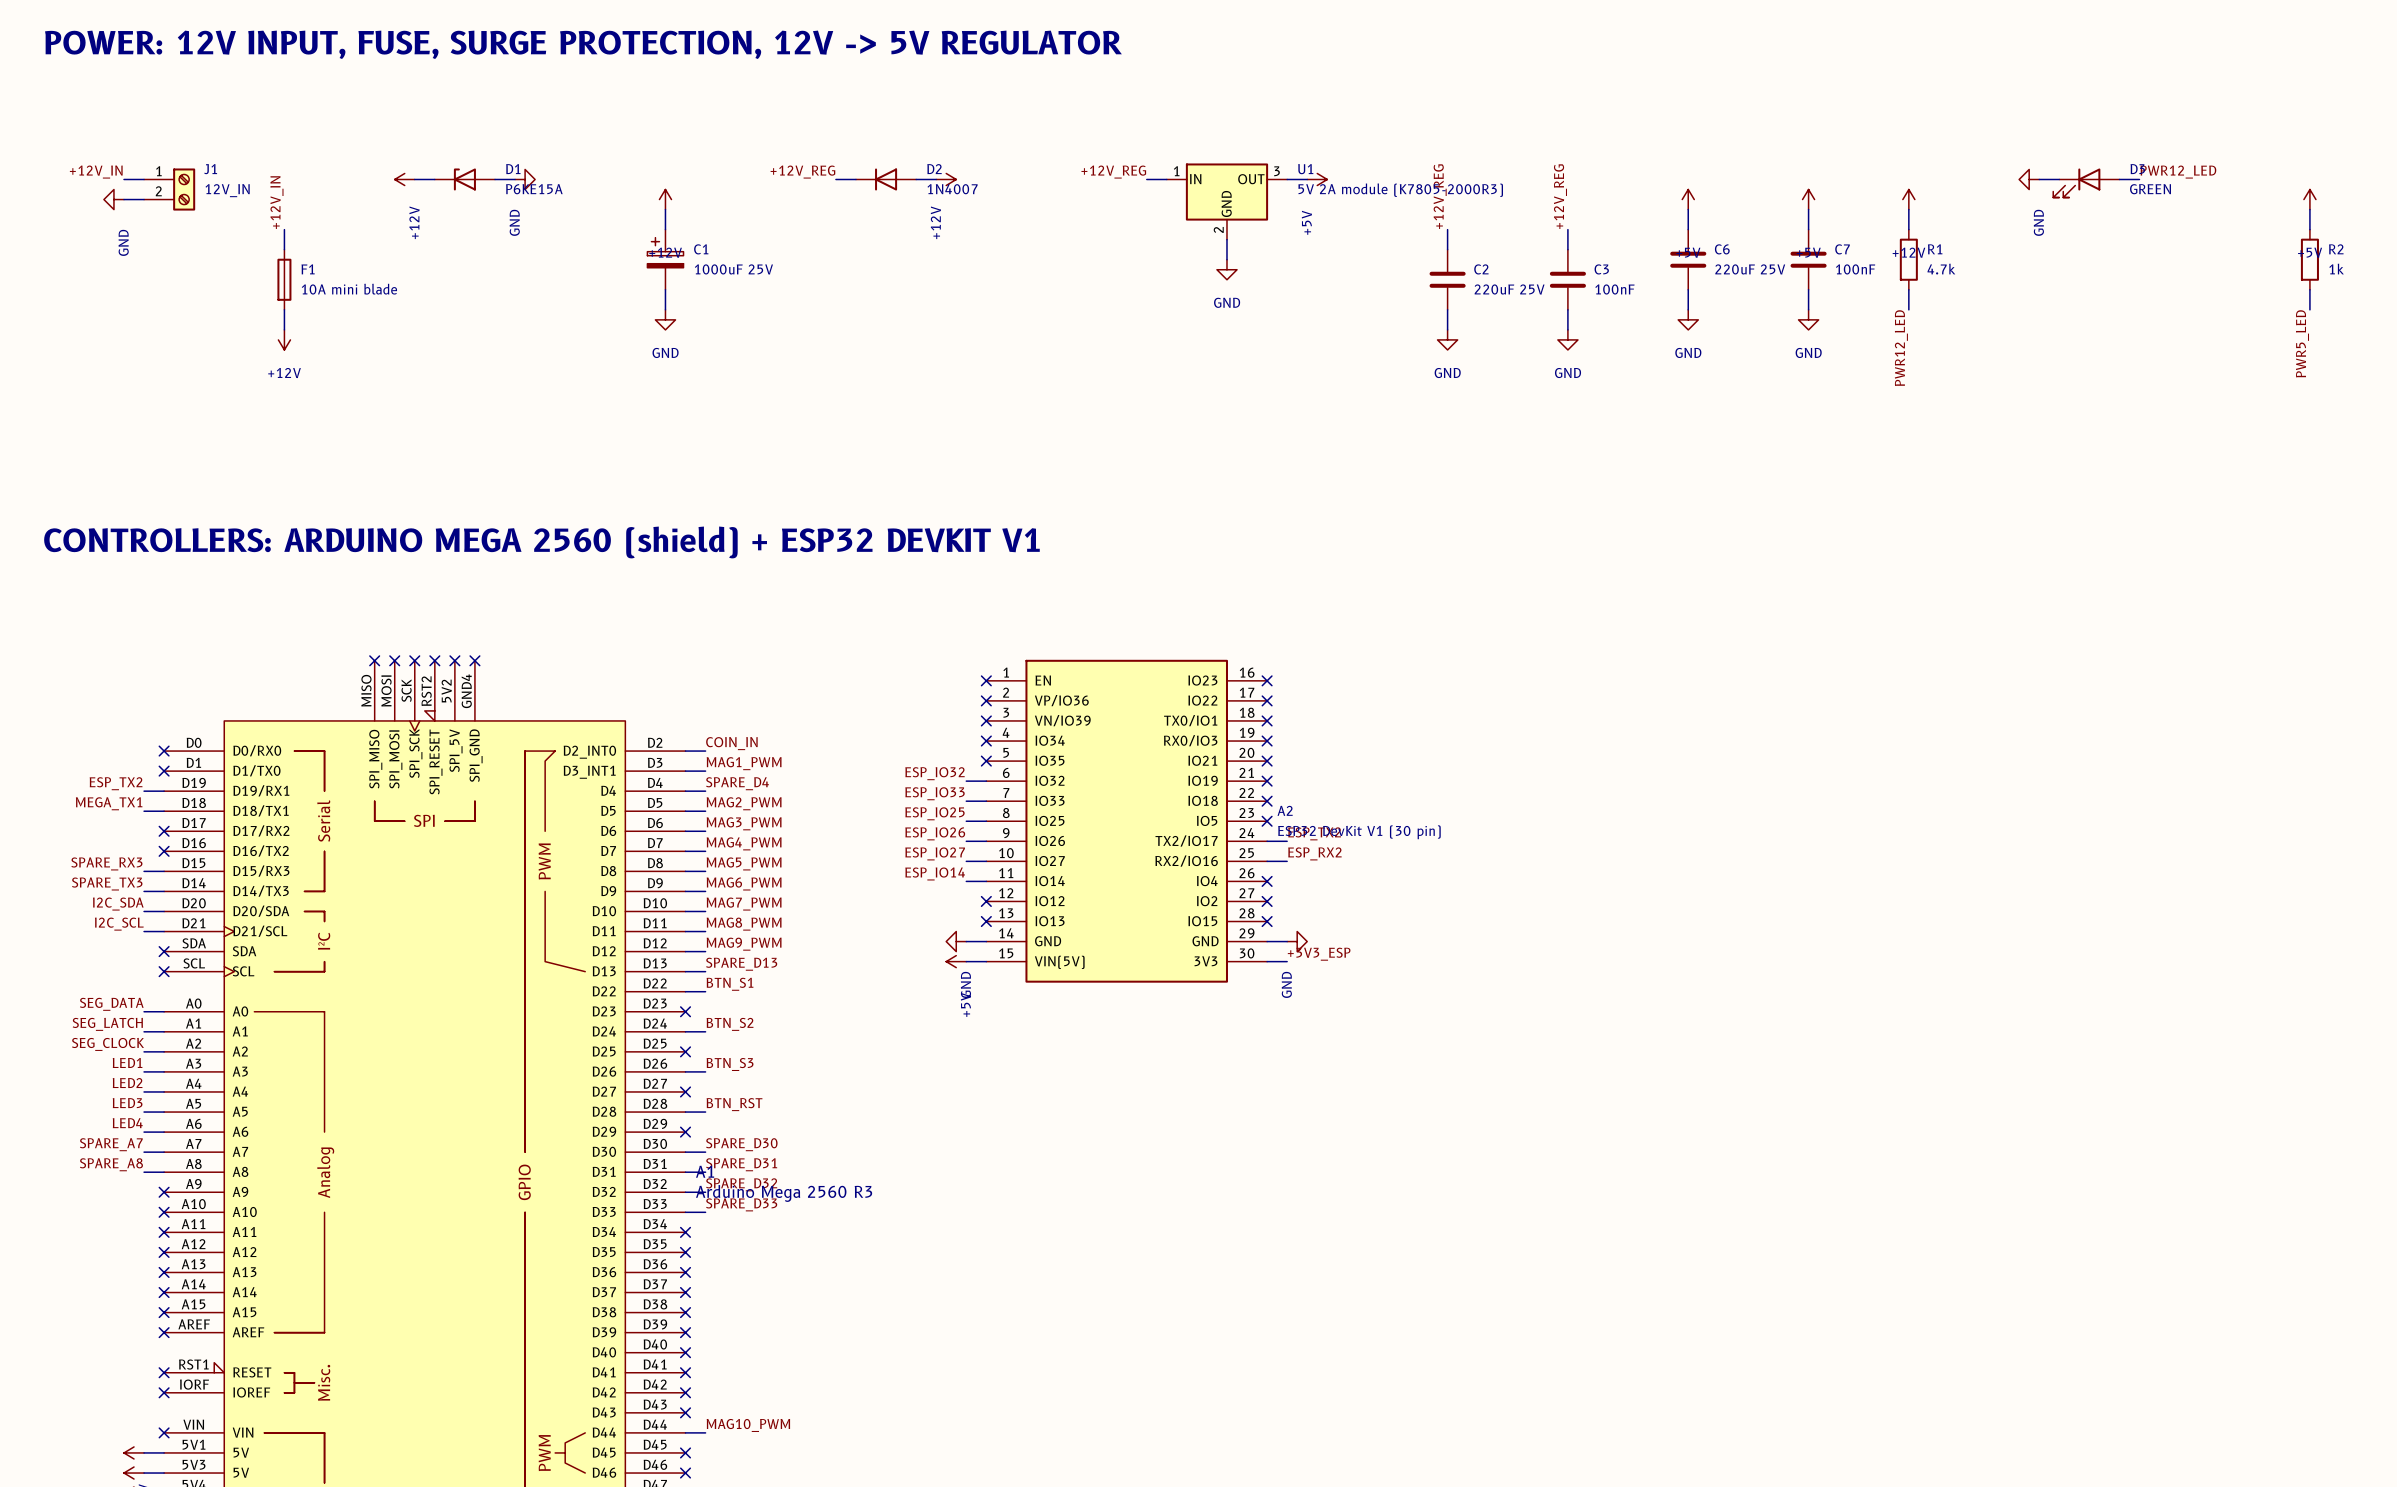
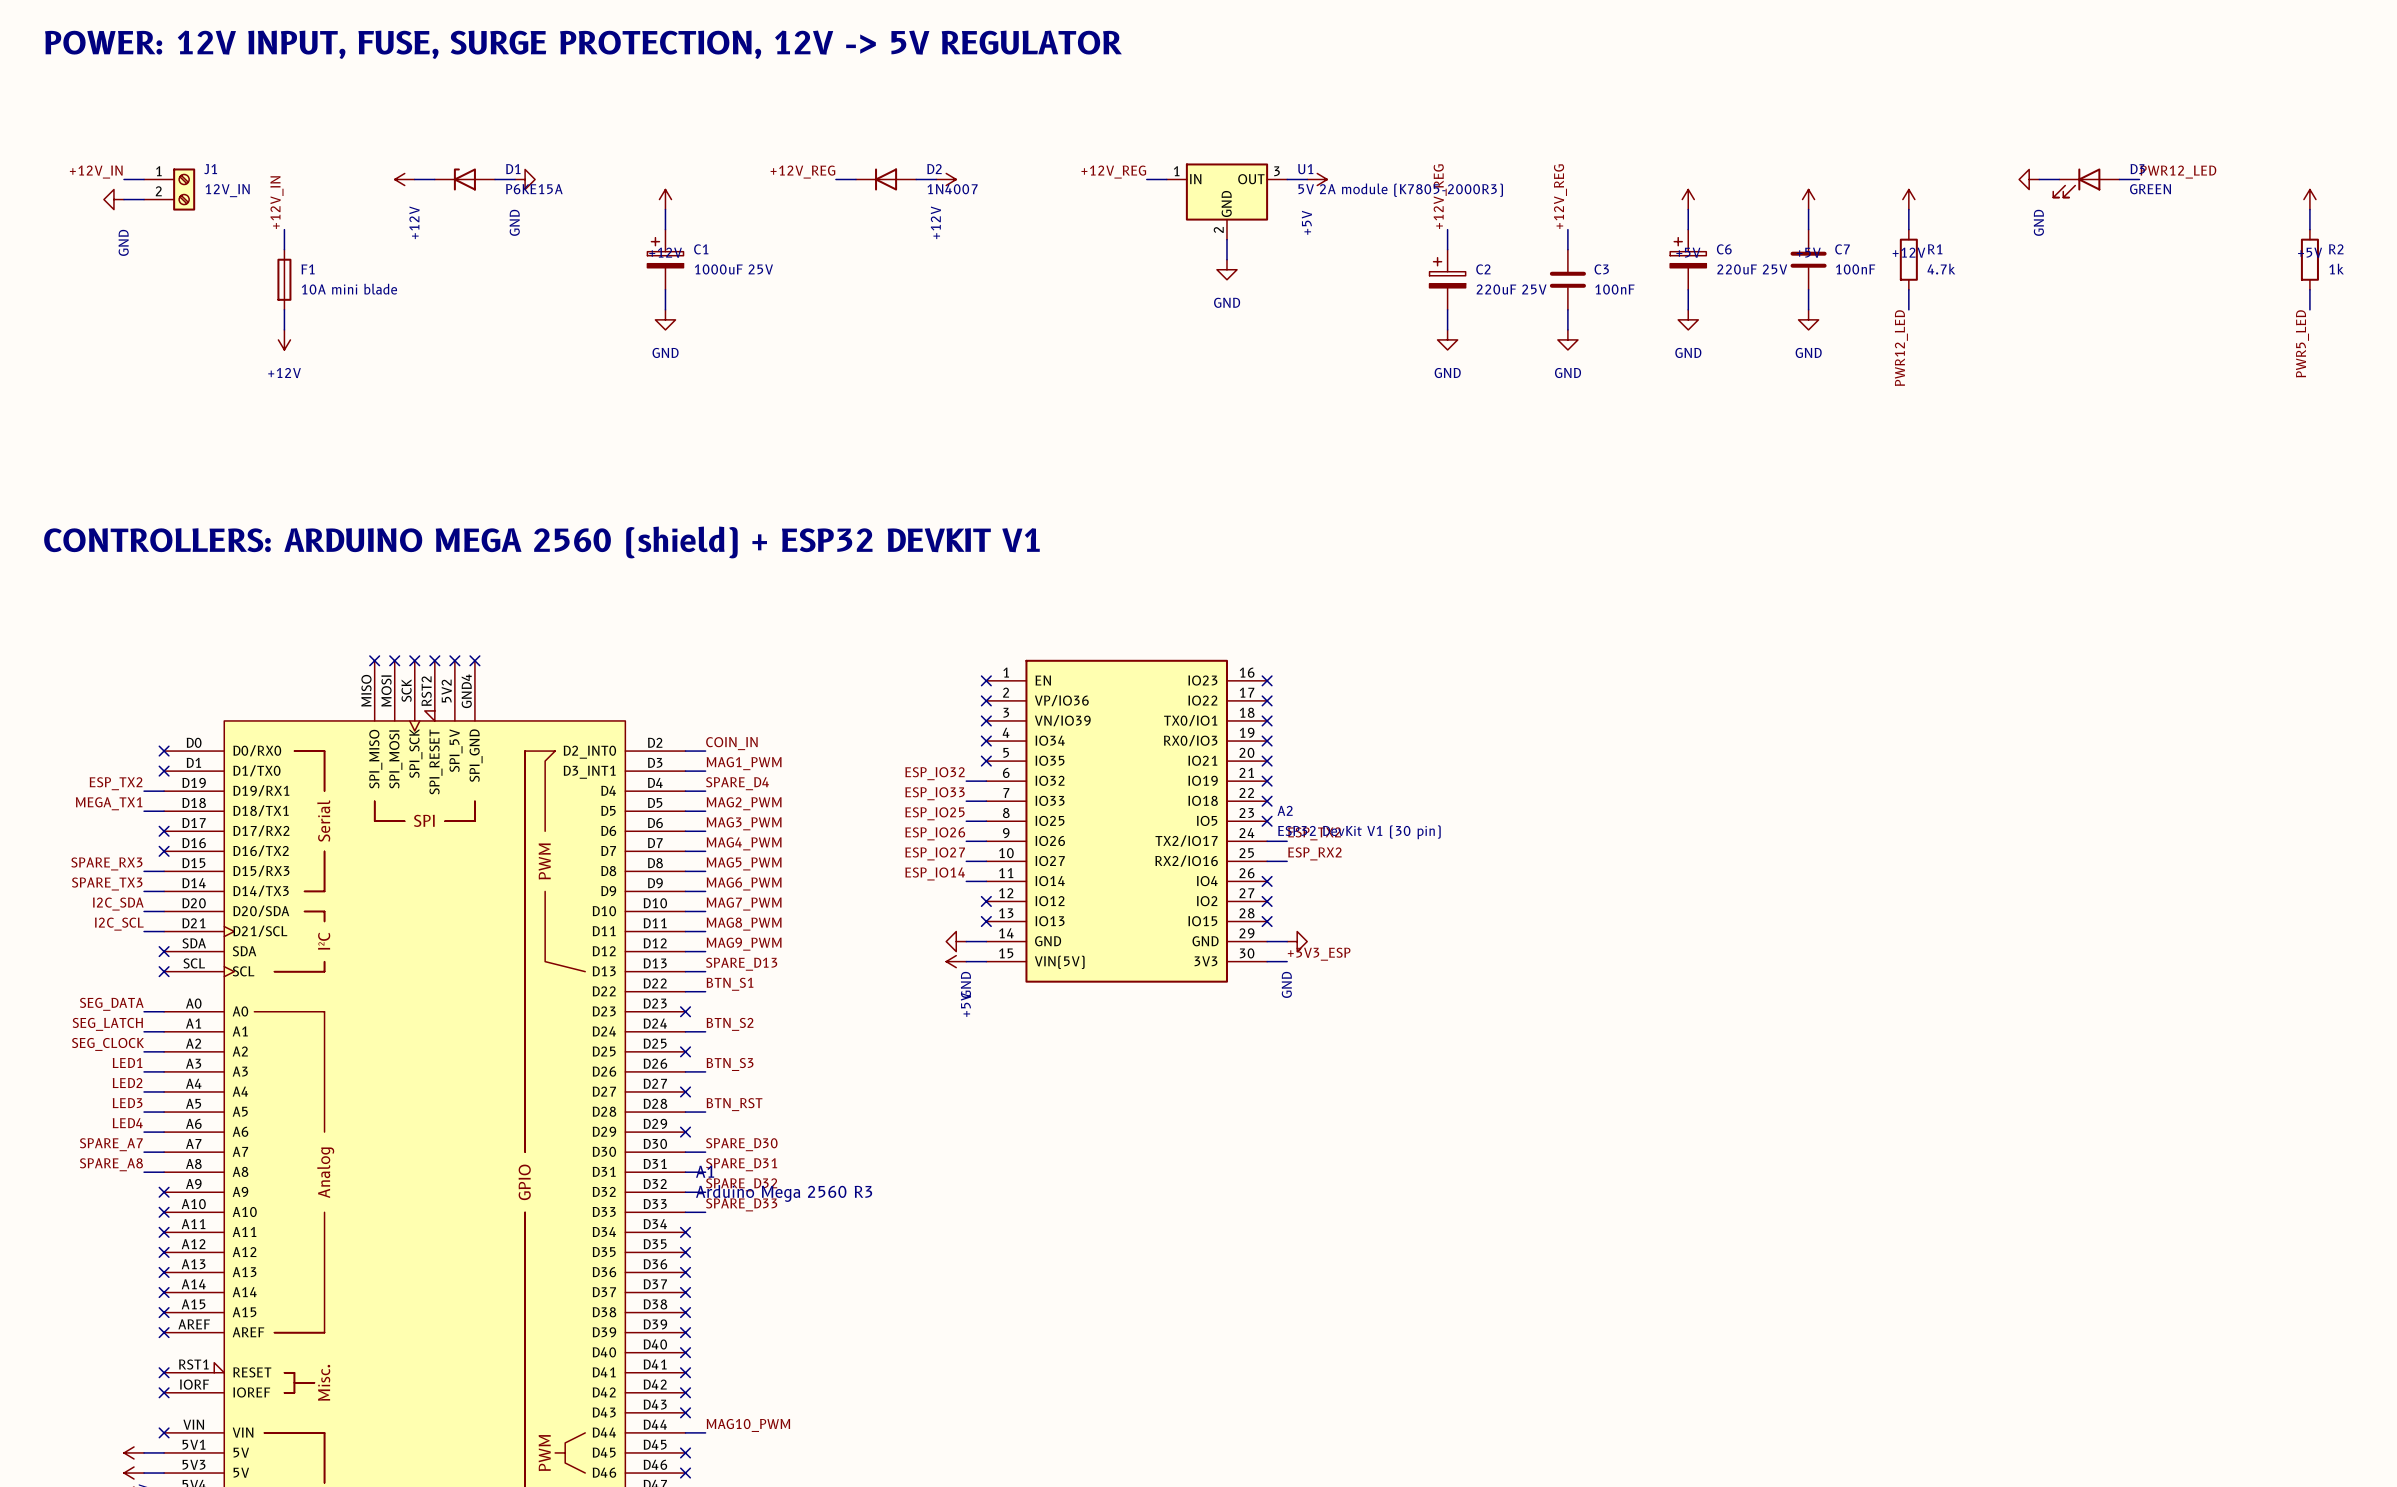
C6 symbol: [1670, 229, 1707, 290] -> [1670, 229, 1707, 290]
C2 symbol: [1429, 249, 1466, 310] -> [1429, 249, 1466, 310]

